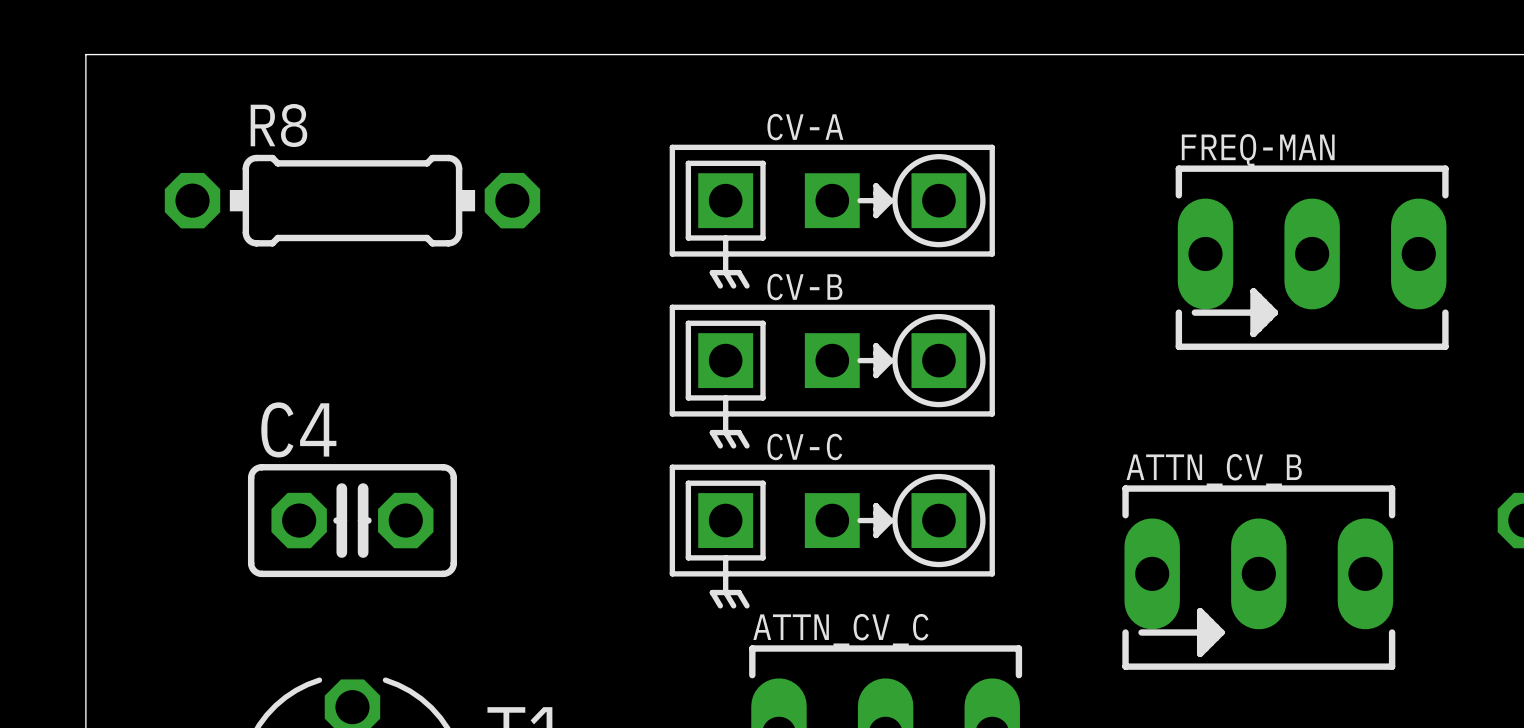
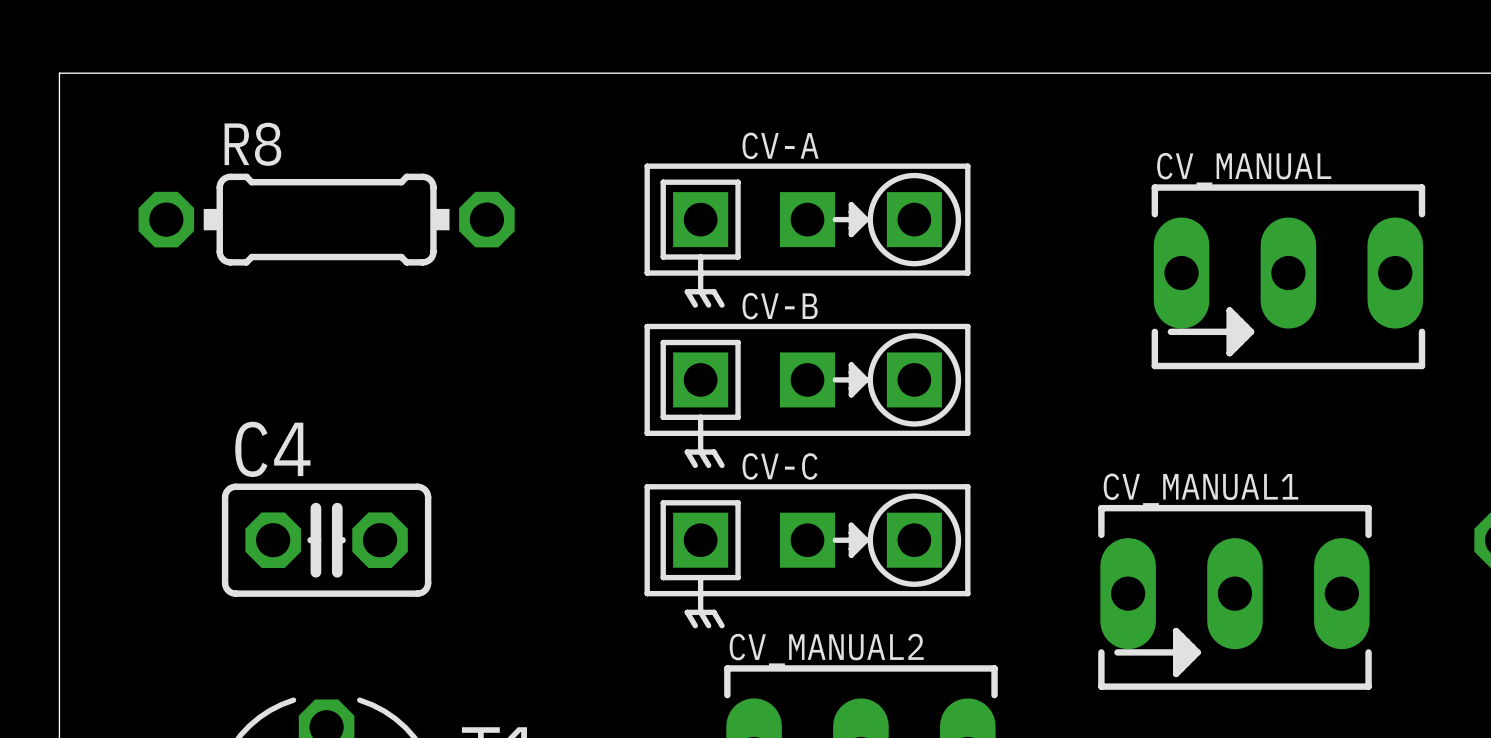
FREQ-MAN name: FREQ-MAN (1258, 150) -> CV_MANUAL (1244, 169)
ATTN_CV_B name: ATTN_CV_B (1214, 470) -> CV_MANUAL1 (1200, 489)
ATTN_CV_C name: ATTN_CV_C (840, 630) -> CV_MANUAL2 (826, 649)

